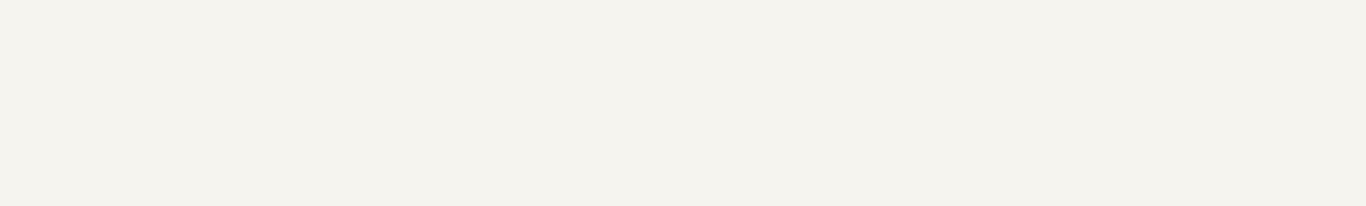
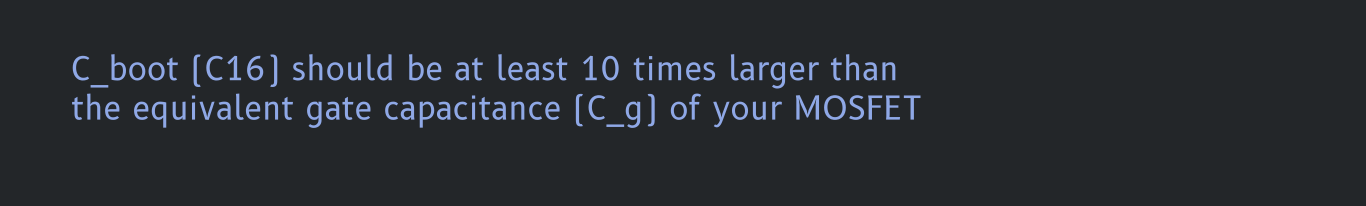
text: none -> C_boot (C16) should be at least 10 times larger than (484, 71)
text: none -> the equivalent gate capacitance (C_g) of your MOSFET (496, 110)

